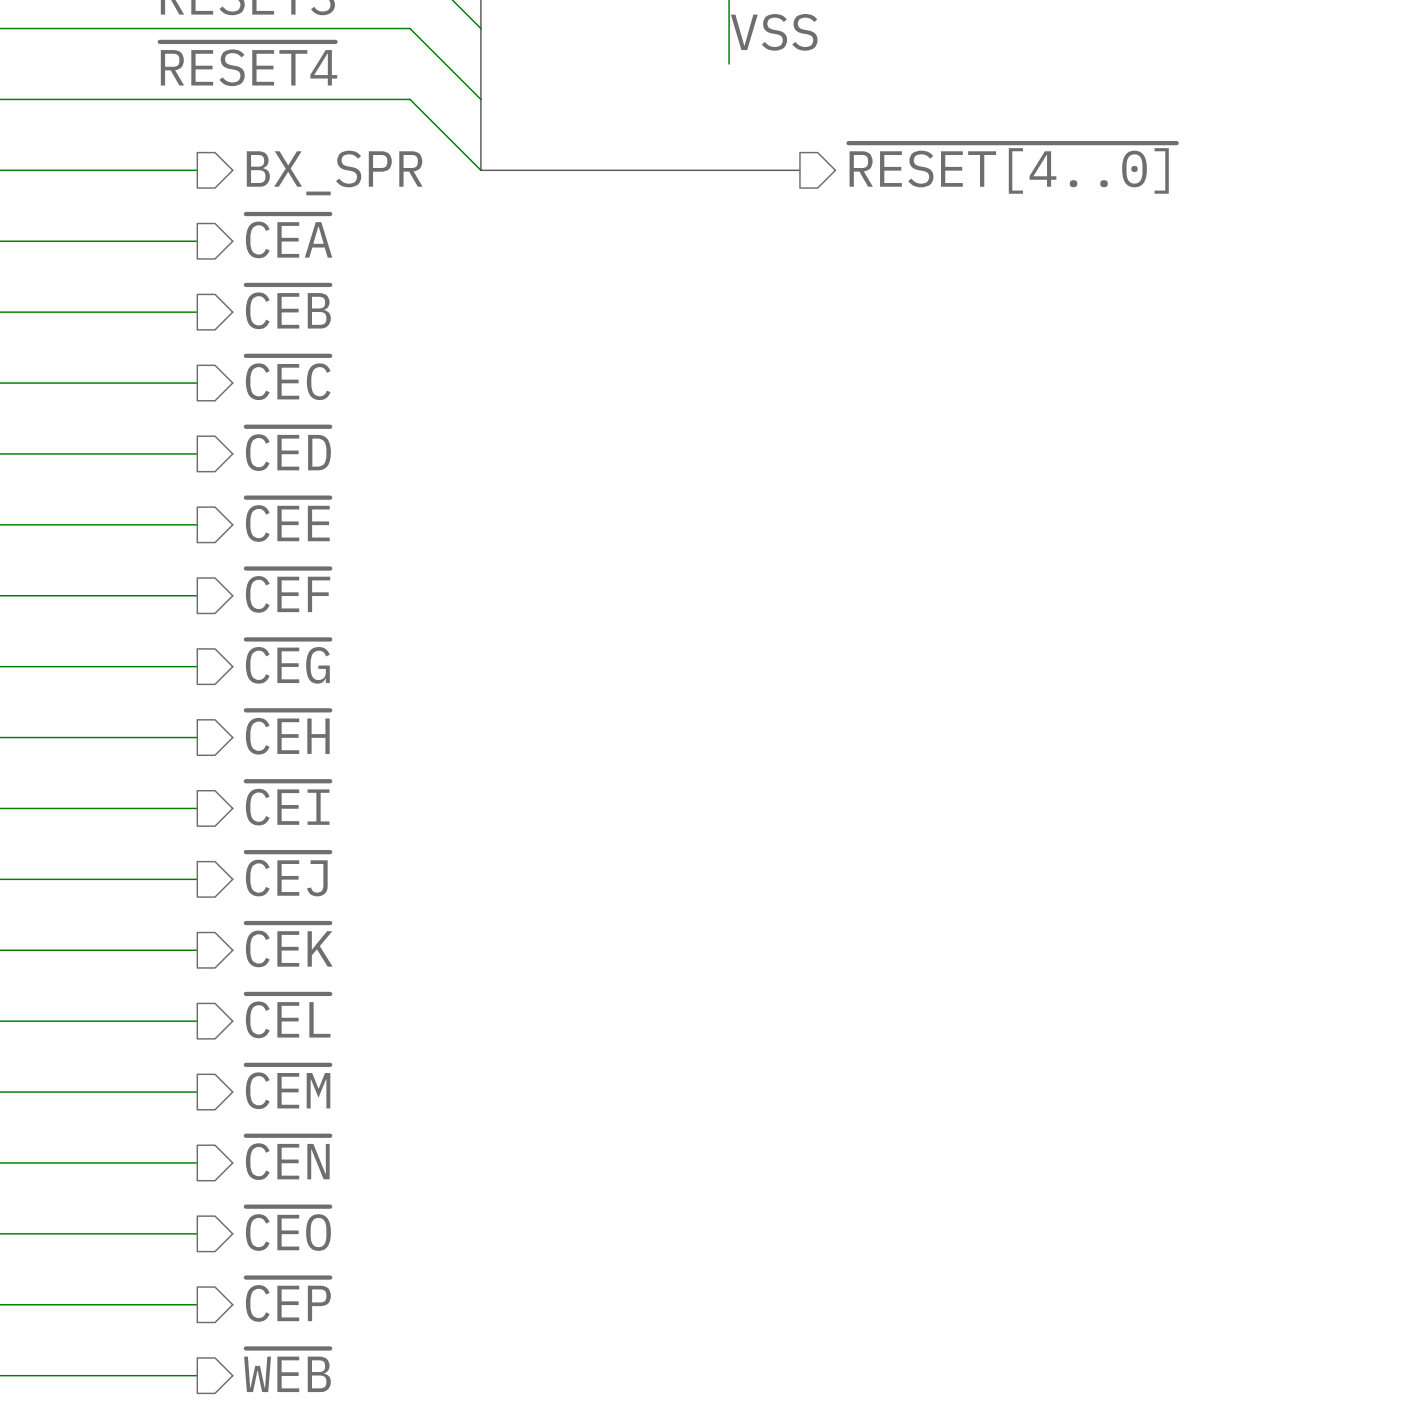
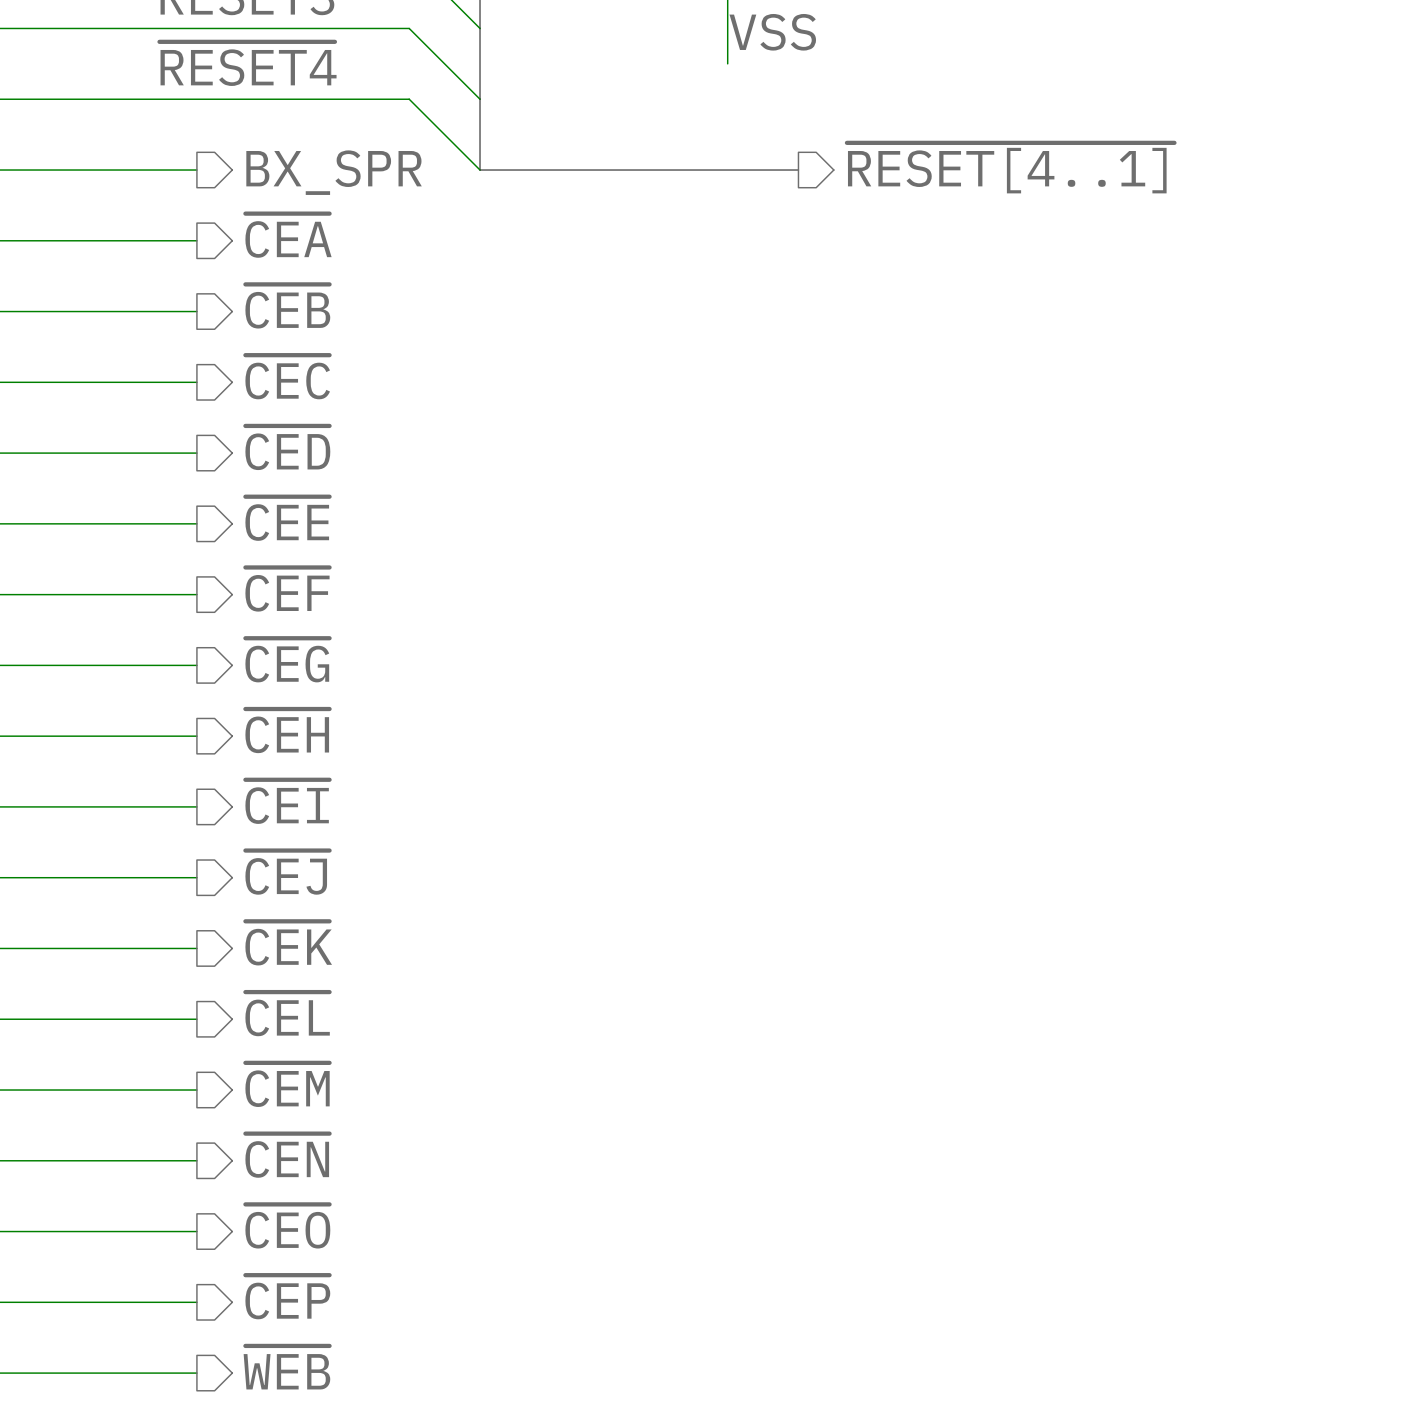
hierarchical label: ~{RESET[4..0]} (1012, 168) -> ~{RESET[4..1]} (1010, 168)

